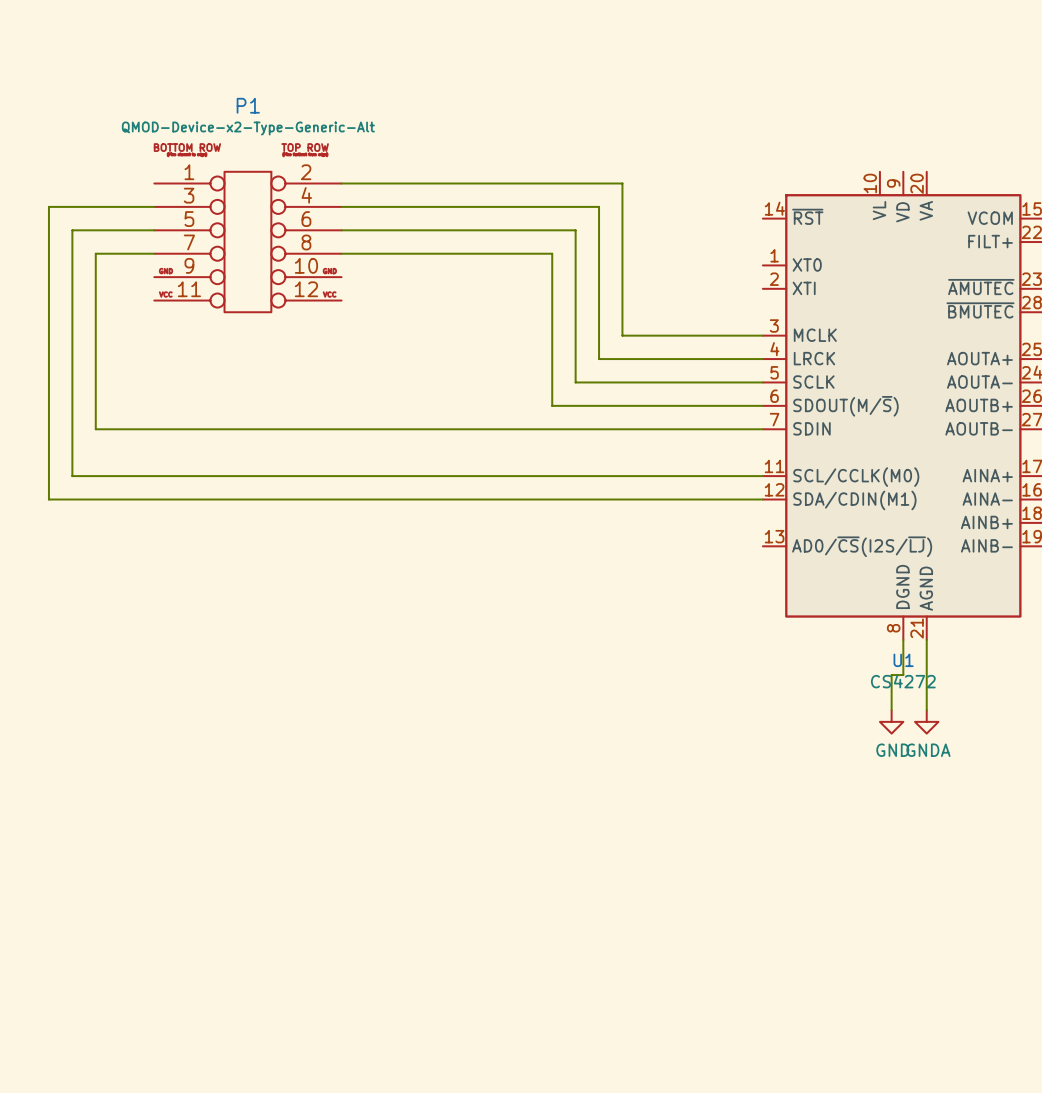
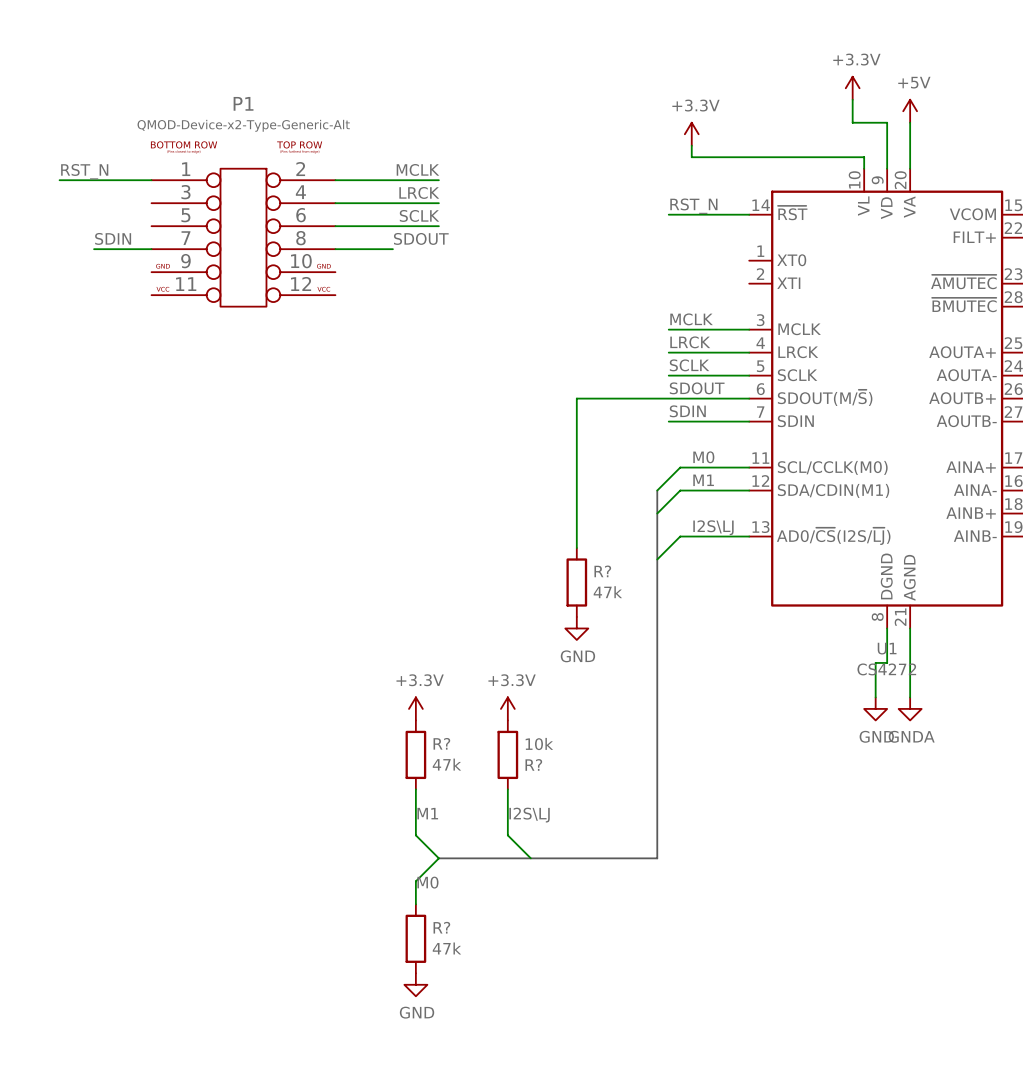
power symbol: none -> +3.3V (852, 88)
wire: none -> (852, 99) (852, 122) (887, 122) (887, 168)
power symbol: none -> +5V (910, 111)
wire: none -> (910, 122) (910, 168)
power symbol: none -> +3.3V (691, 134)
wire: none -> (691, 145) (691, 157) (864, 157) (864, 168)
label: none -> RST_N (84, 171)
label: none -> MCLK (417, 169)
wire: none -> (59, 180) (151, 180)
wire: (446, 183) (622, 183) (622, 335) (680, 335) -> none
label: none -> LRCK (419, 192)
wire: (154, 206) (48, 206) (48, 499) (692, 499) -> (657, 513) (680, 490)
wire: (446, 206) (599, 206) (599, 359) (680, 359) -> none
label: none -> RST_N (693, 206)
wire: none -> (668, 214) (749, 214)
label: none -> SCLK (419, 215)
wire: (154, 230) (72, 230) (72, 476) (692, 476) -> (657, 490) (680, 467)
wire: (446, 230) (575, 230) (575, 382) (680, 382) -> none
label: none -> SDIN (113, 238)
label: none -> SDOUT (421, 238)
wire: (95, 253) (95, 429) (680, 429) -> none
wire: (400, 253) (552, 253) (552, 405) (587, 405) -> (576, 548) (576, 398)
label: none -> MCLK (691, 319)
label: none -> LRCK (690, 342)
label: none -> SCLK (689, 365)
label: none -> SDOUT (697, 388)
label: none -> SDIN (687, 411)
label: none -> M0 (703, 457)
label: none -> M1 (703, 480)
bus: none -> (657, 490) (657, 858) (438, 858)
label: none -> I2S\LJ (713, 527)
wire: none -> (749, 536) (680, 536) (657, 559)
R?: none -> 47k (576, 582)
power symbol: none -> GND (576, 628)
power symbol: none -> +3.3V (415, 708)
power symbol: none -> +3.3V (507, 708)
R?: none -> 47k (415, 754)
R?: none -> 10k (507, 754)
wire: none -> (415, 789) (415, 835) (438, 858) (415, 881) (415, 904)
wire: none -> (507, 789) (507, 835) (530, 858)
label: none -> M1 (427, 813)
label: none -> I2S\LJ (529, 815)
label: none -> M0 (427, 882)
R?: none -> 47k (415, 938)
power symbol: none -> GND (415, 984)

